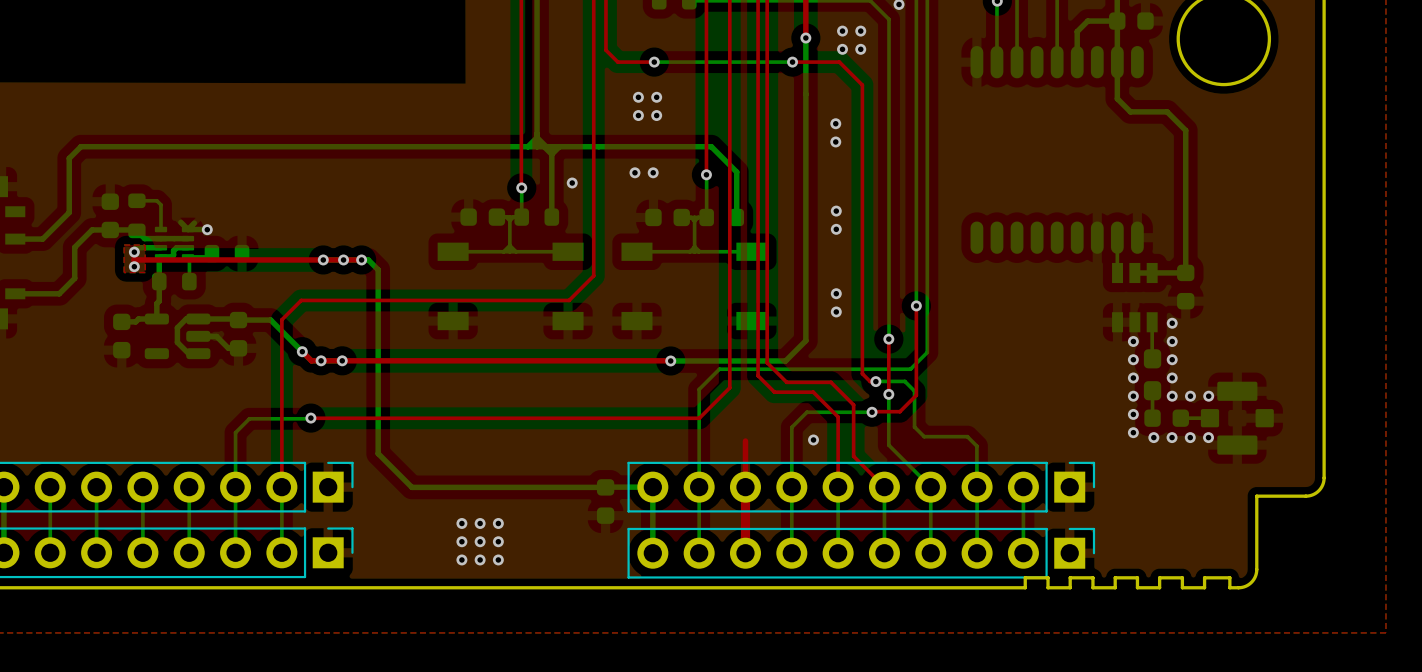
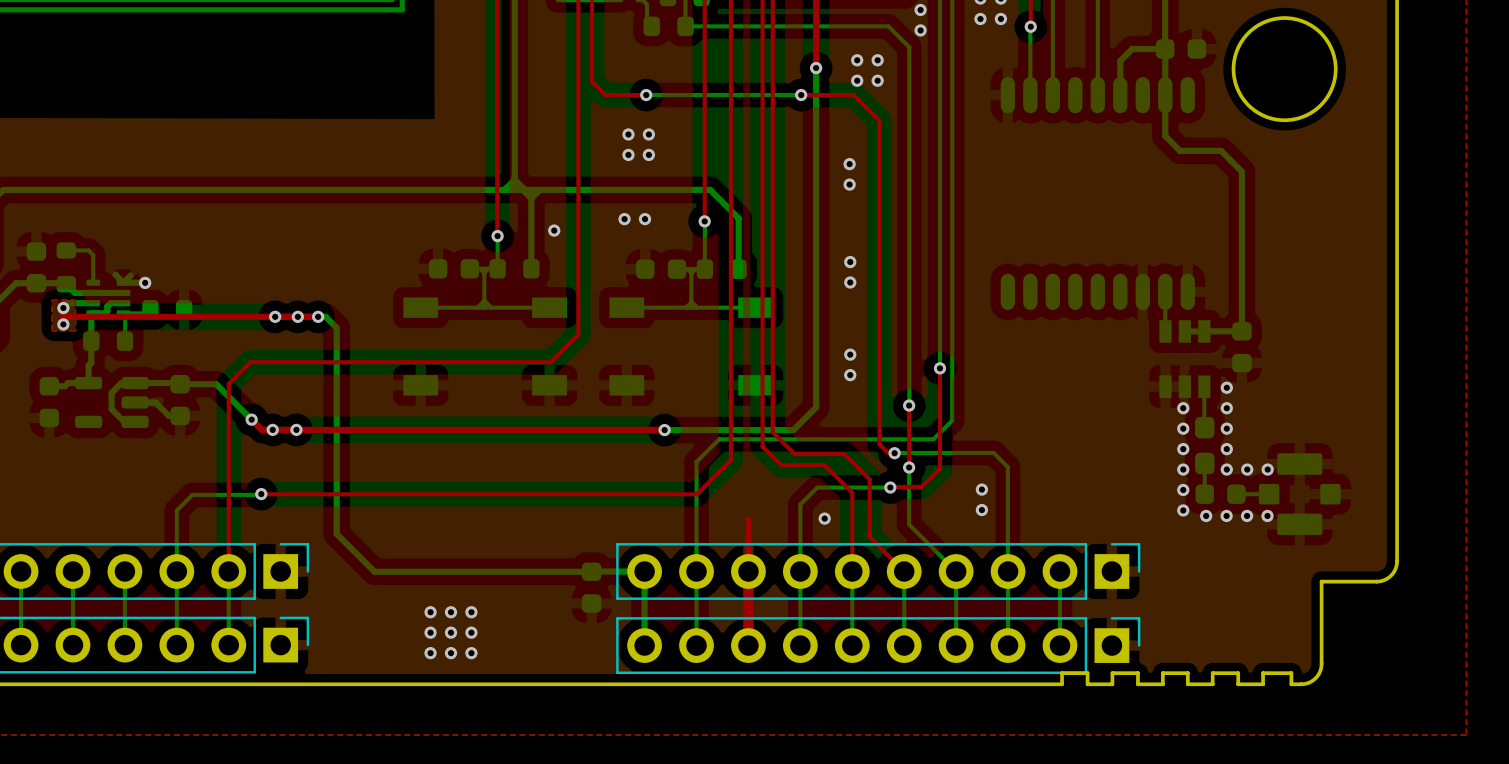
bottom track: (904, 381) (914, 391) (914, 427) (924, 436) (967, 436) (976, 446) -> (927, 452) (993, 452) (1007, 467) (1007, 525)
via: none -> (981, 489)
via: none -> (981, 510)

